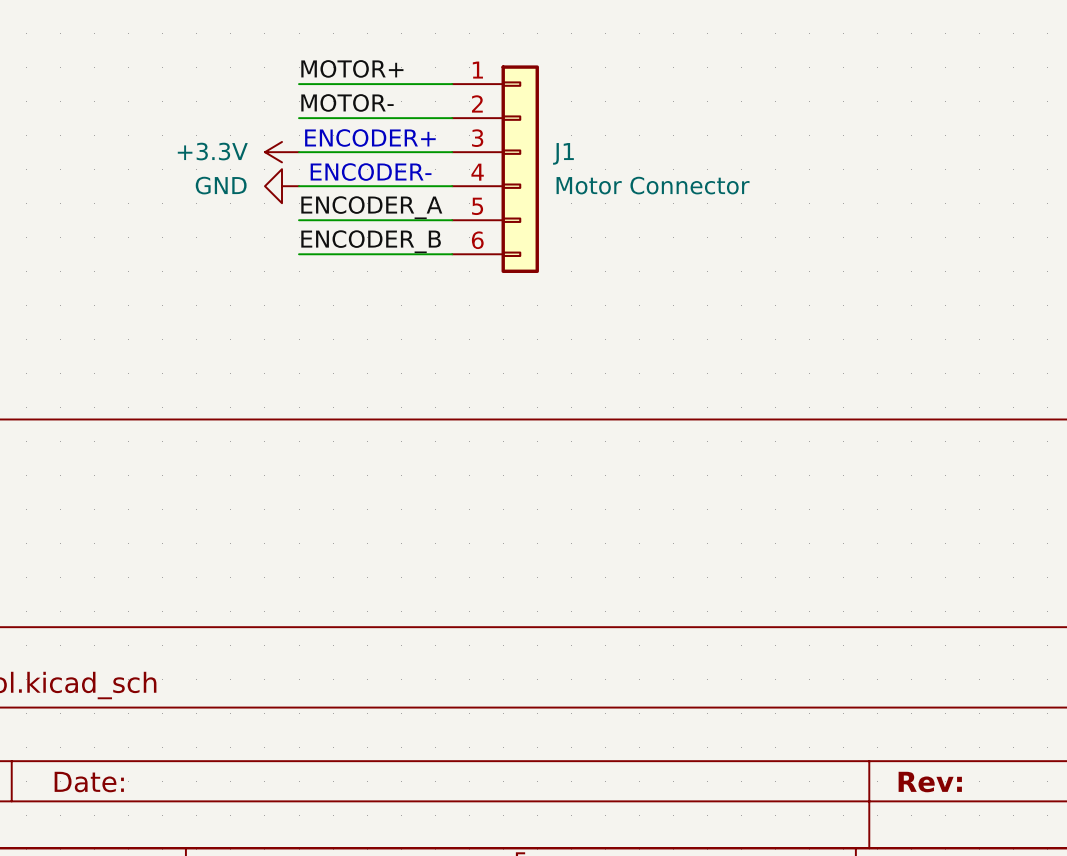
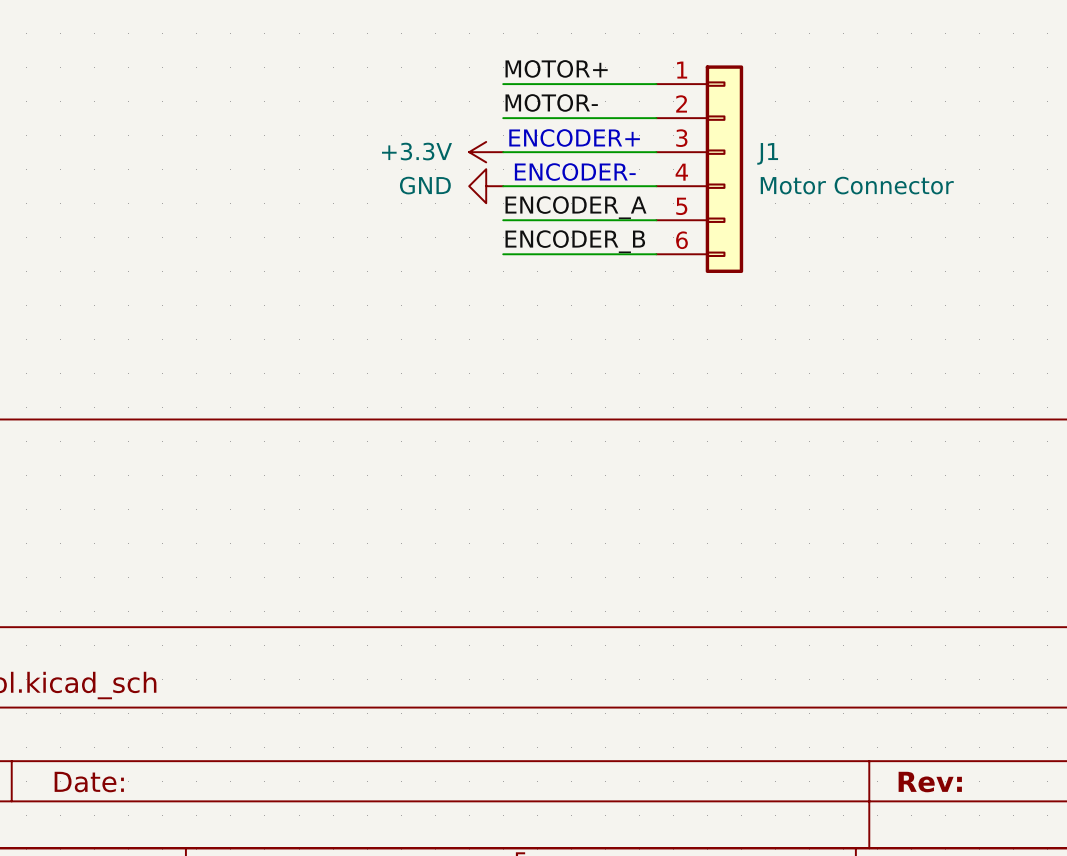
label position: MOTOR+ (352, 68) -> MOTOR+ (556, 68)
wire: (299, 84) (452, 84) -> (503, 84) (656, 84)
label position: MOTOR- (347, 102) -> MOTOR- (551, 102)
wire: (299, 118) (452, 118) -> (503, 118) (656, 118)
text position: ENCODER+ (370, 137) -> ENCODER+ (574, 137)
power symbol position: +3.3V (282, 152) -> +3.3V (486, 152)
wire: (299, 152) (452, 152) -> (503, 152) (656, 152)
J1 position: (495, 169) -> (699, 169)
text position: ENCODER- (371, 172) -> ENCODER- (575, 172)
power symbol position: GND (282, 186) -> GND (486, 186)
wire: (299, 186) (452, 186) -> (503, 186) (656, 186)
label position: ENCODER_A (371, 207) -> ENCODER_A (575, 207)
wire: (299, 220) (452, 220) -> (503, 220) (656, 220)
label position: ENCODER_B (371, 241) -> ENCODER_B (575, 241)
wire: (299, 254) (452, 254) -> (503, 254) (656, 254)

